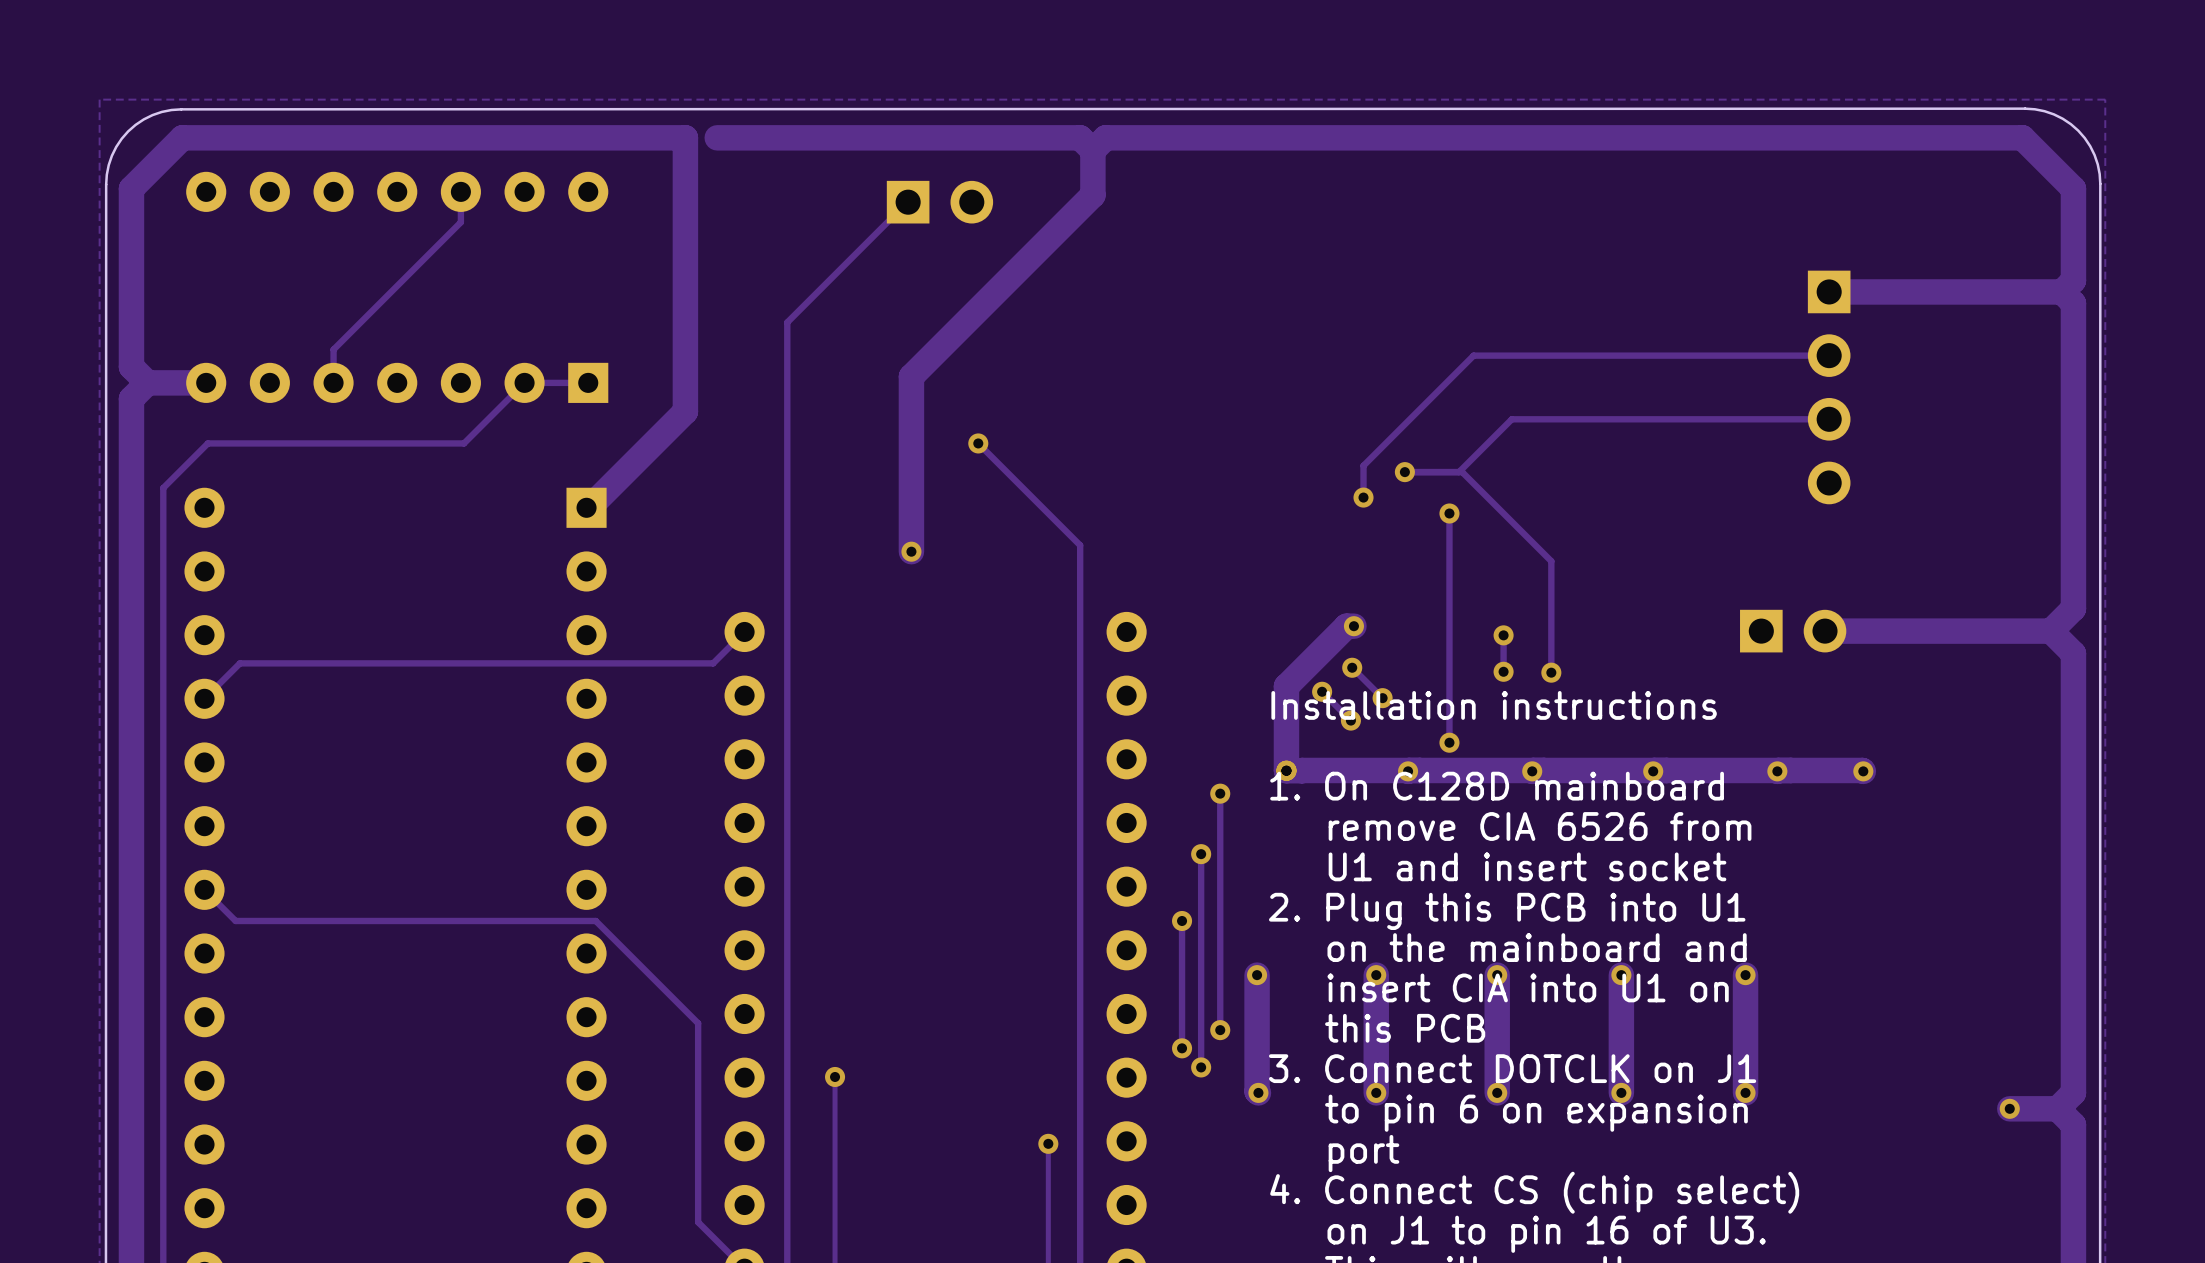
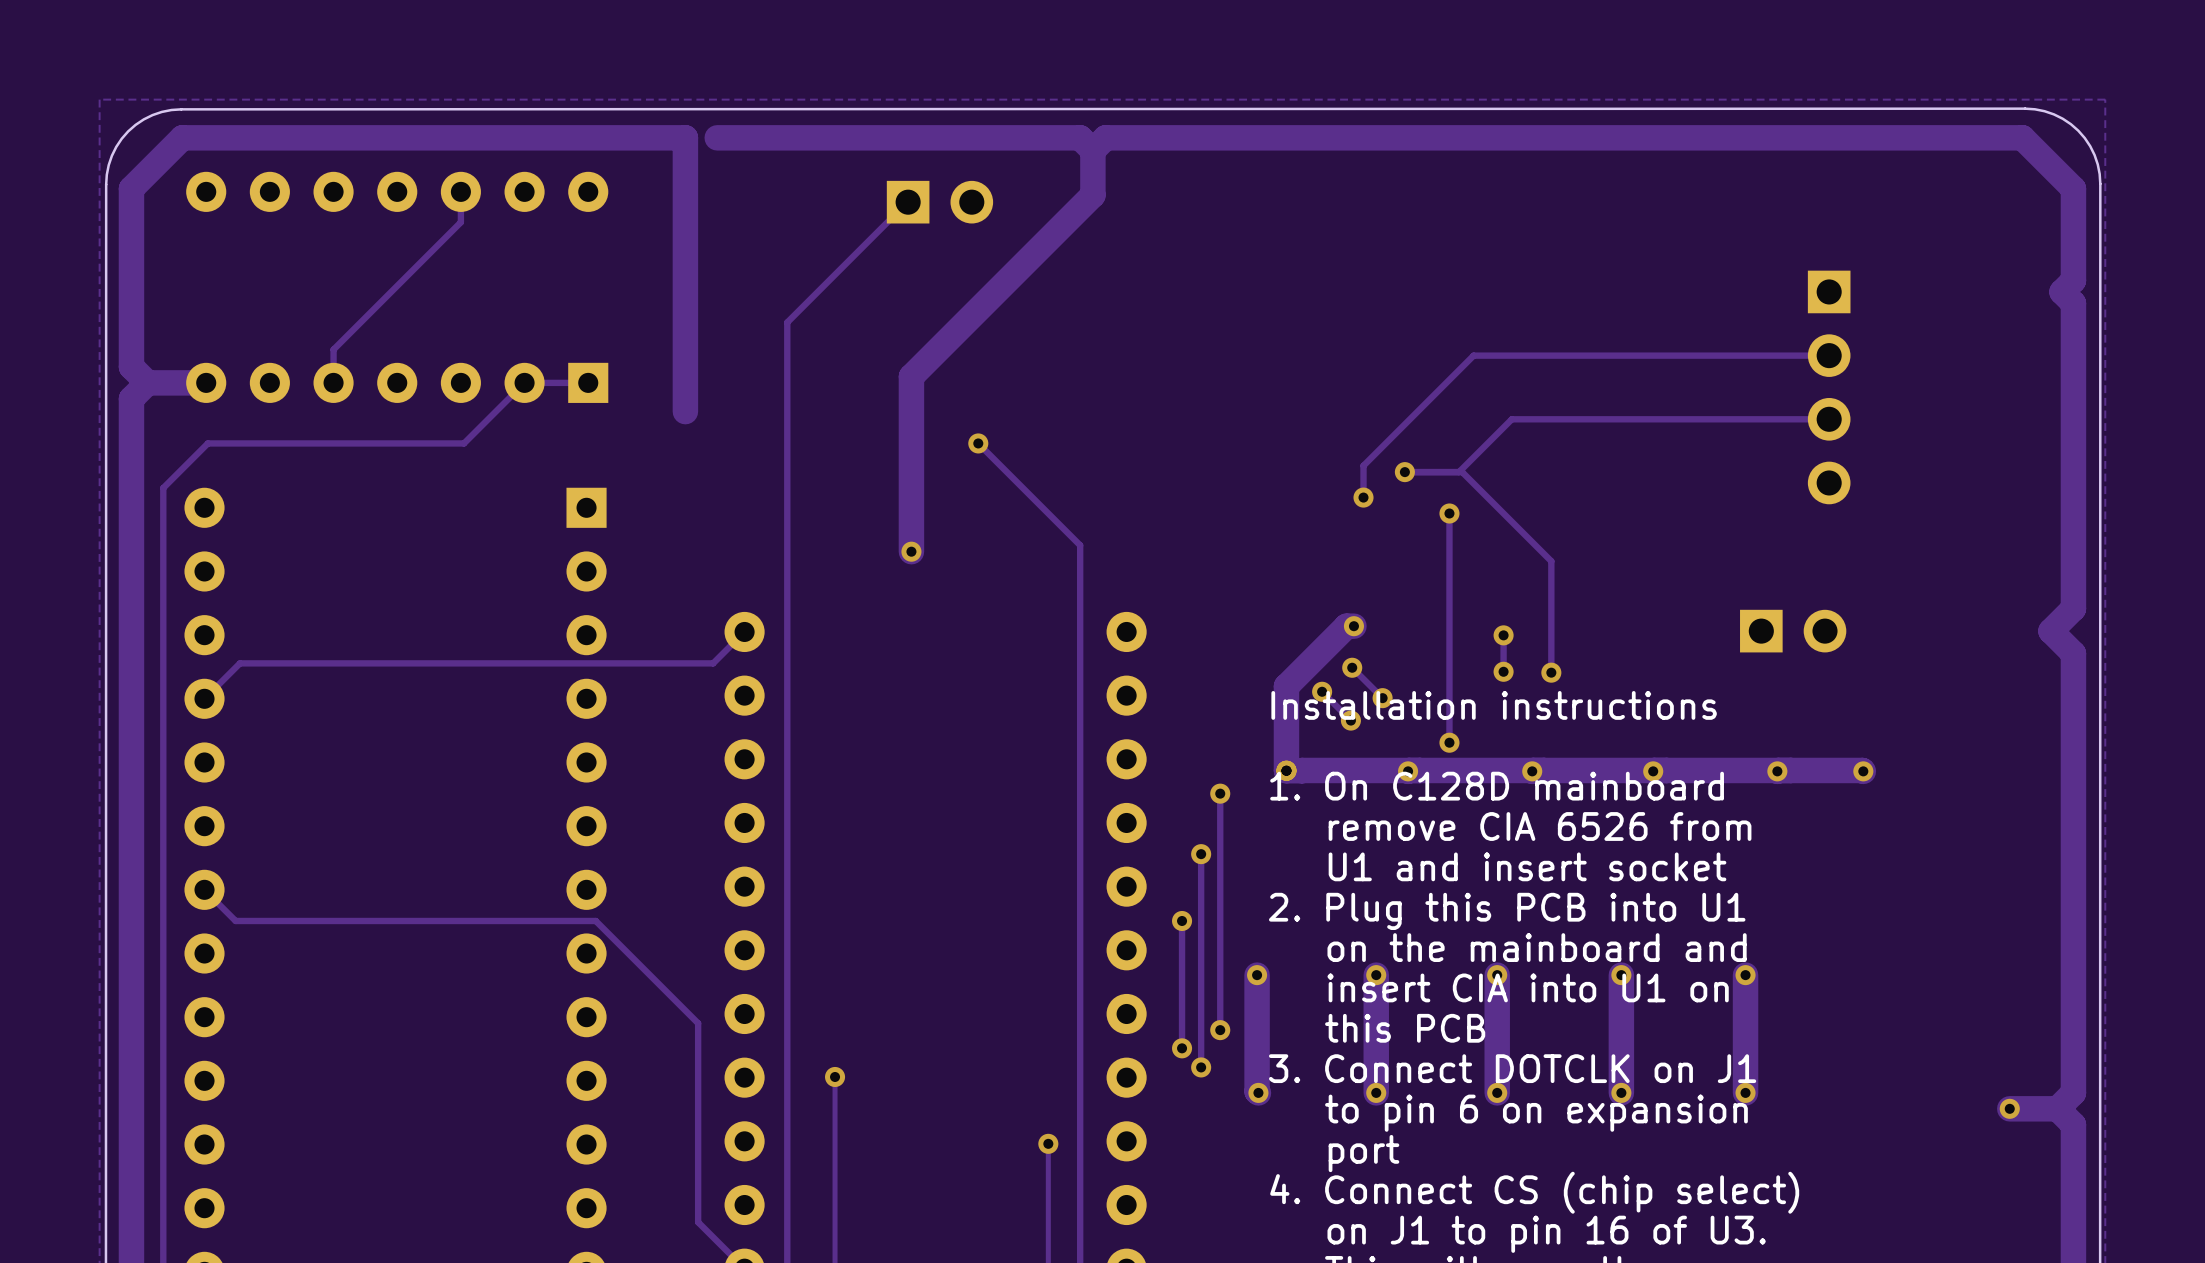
track: (2062, 291) (1829, 291) -> none
track: (685, 411) (589, 507) -> none
track: (2050, 631) (1825, 631) -> none

